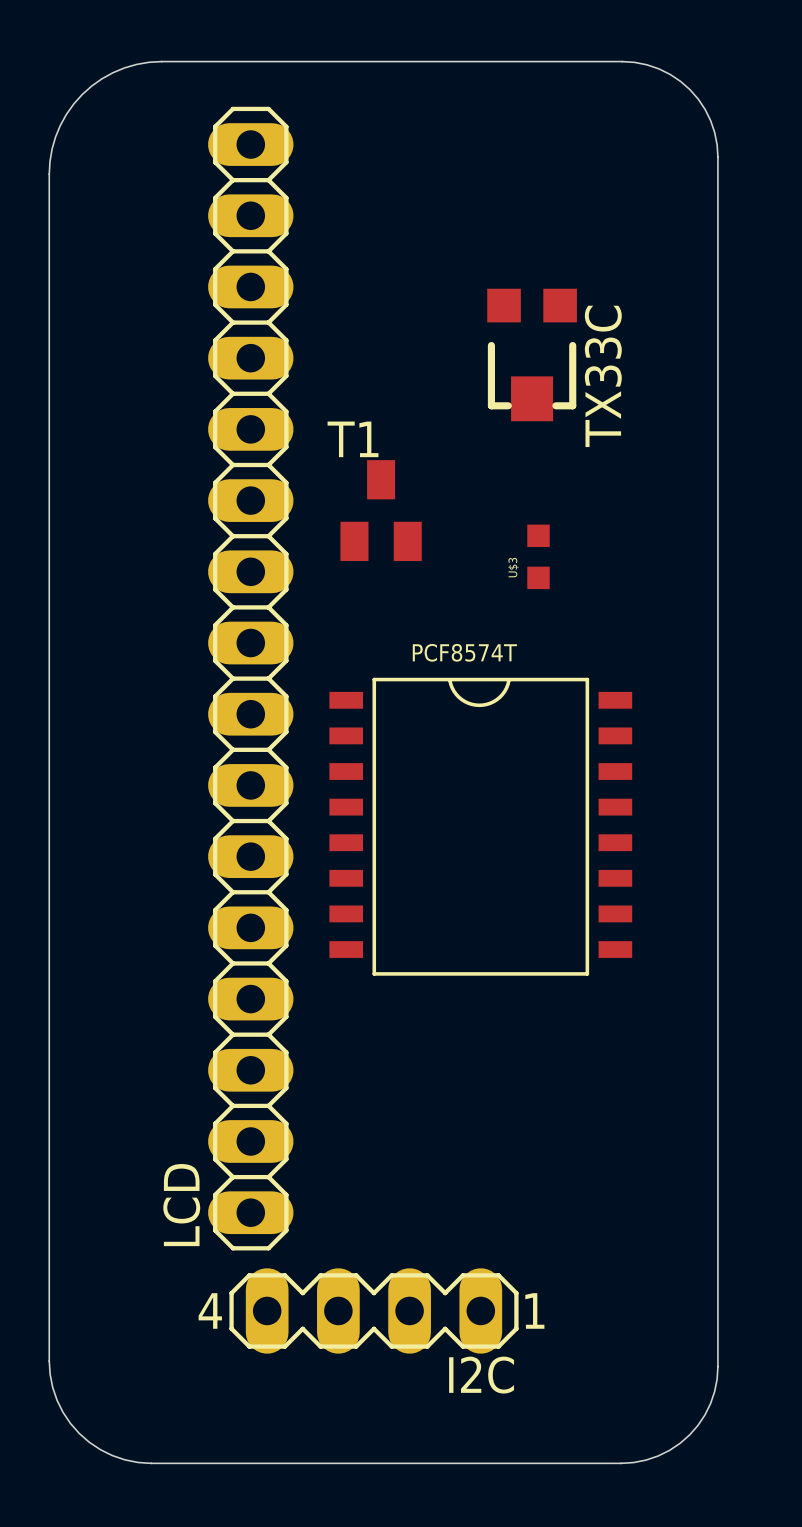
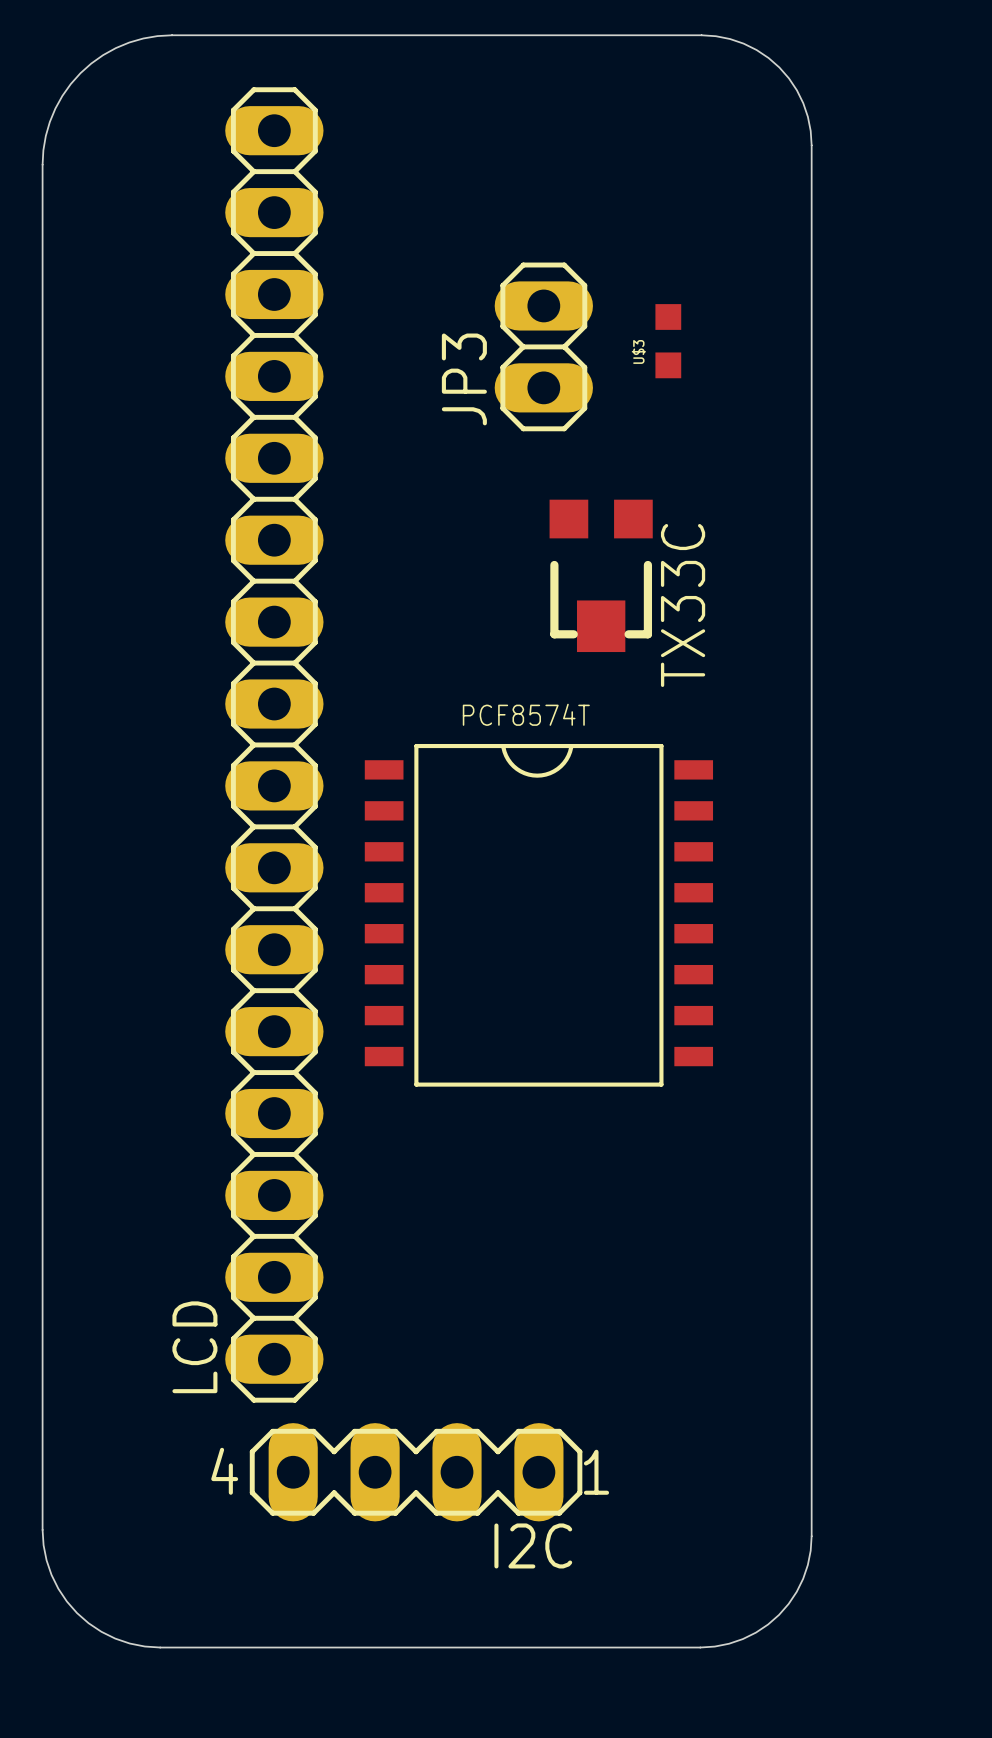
JP3: none -> (543, 346)
TX33C position: (532, 354) -> (601, 575)
T1: (381, 510) -> none
U$3 position: (538, 556) -> (668, 341)

